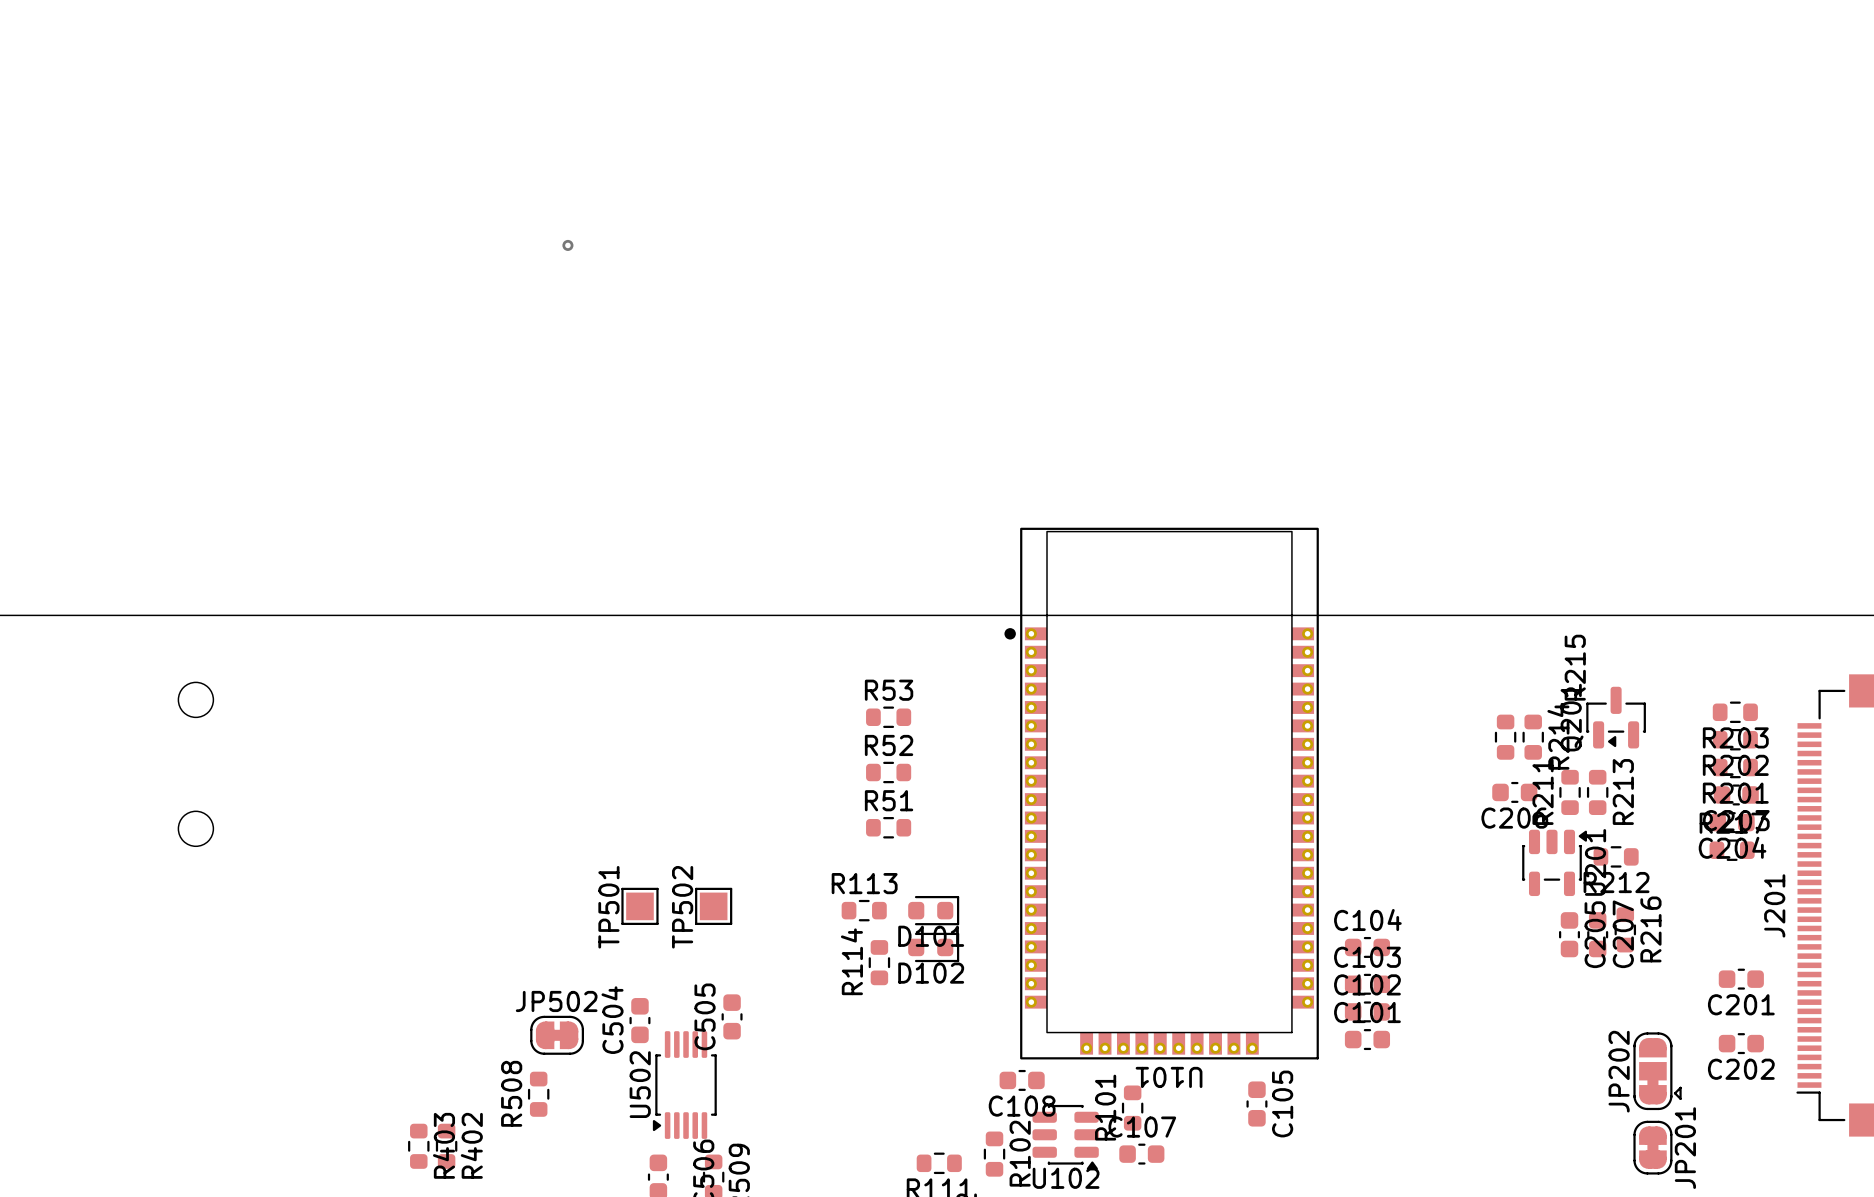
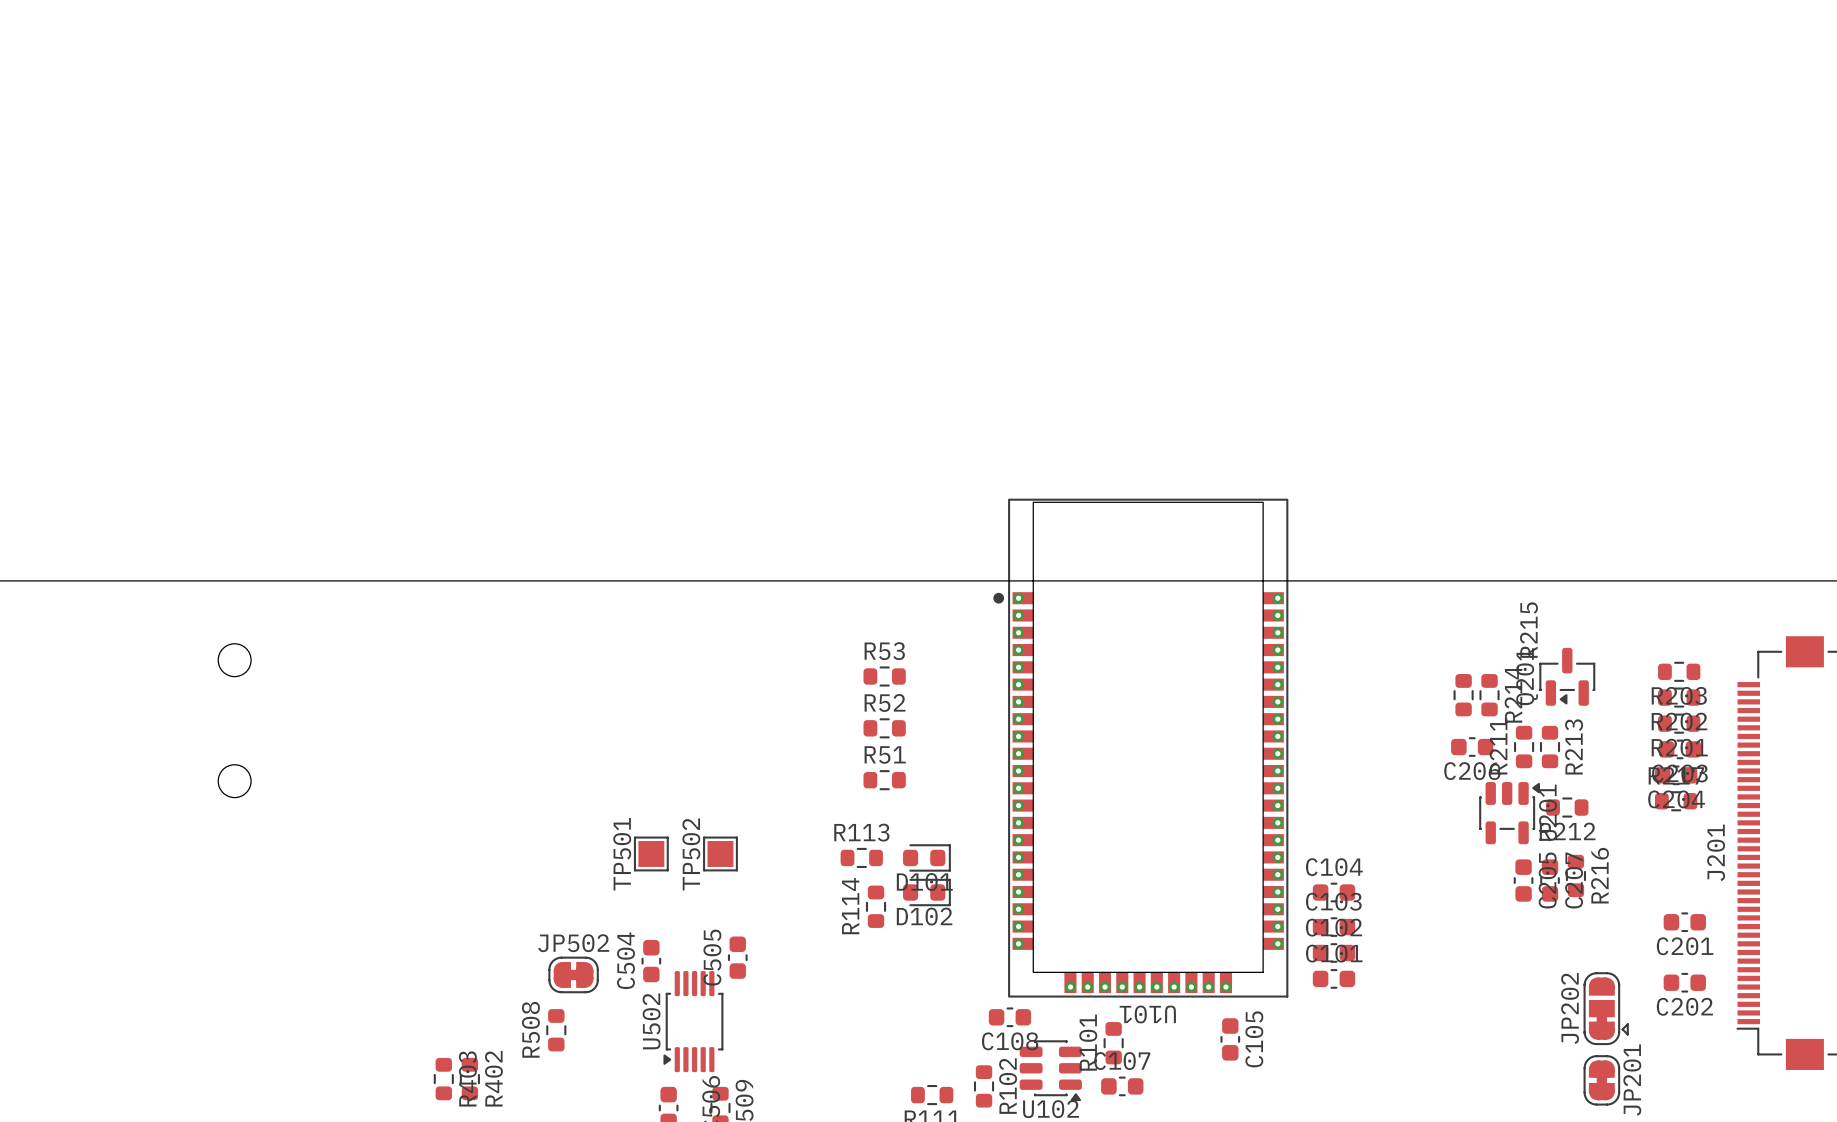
via: (567, 245) -> none

